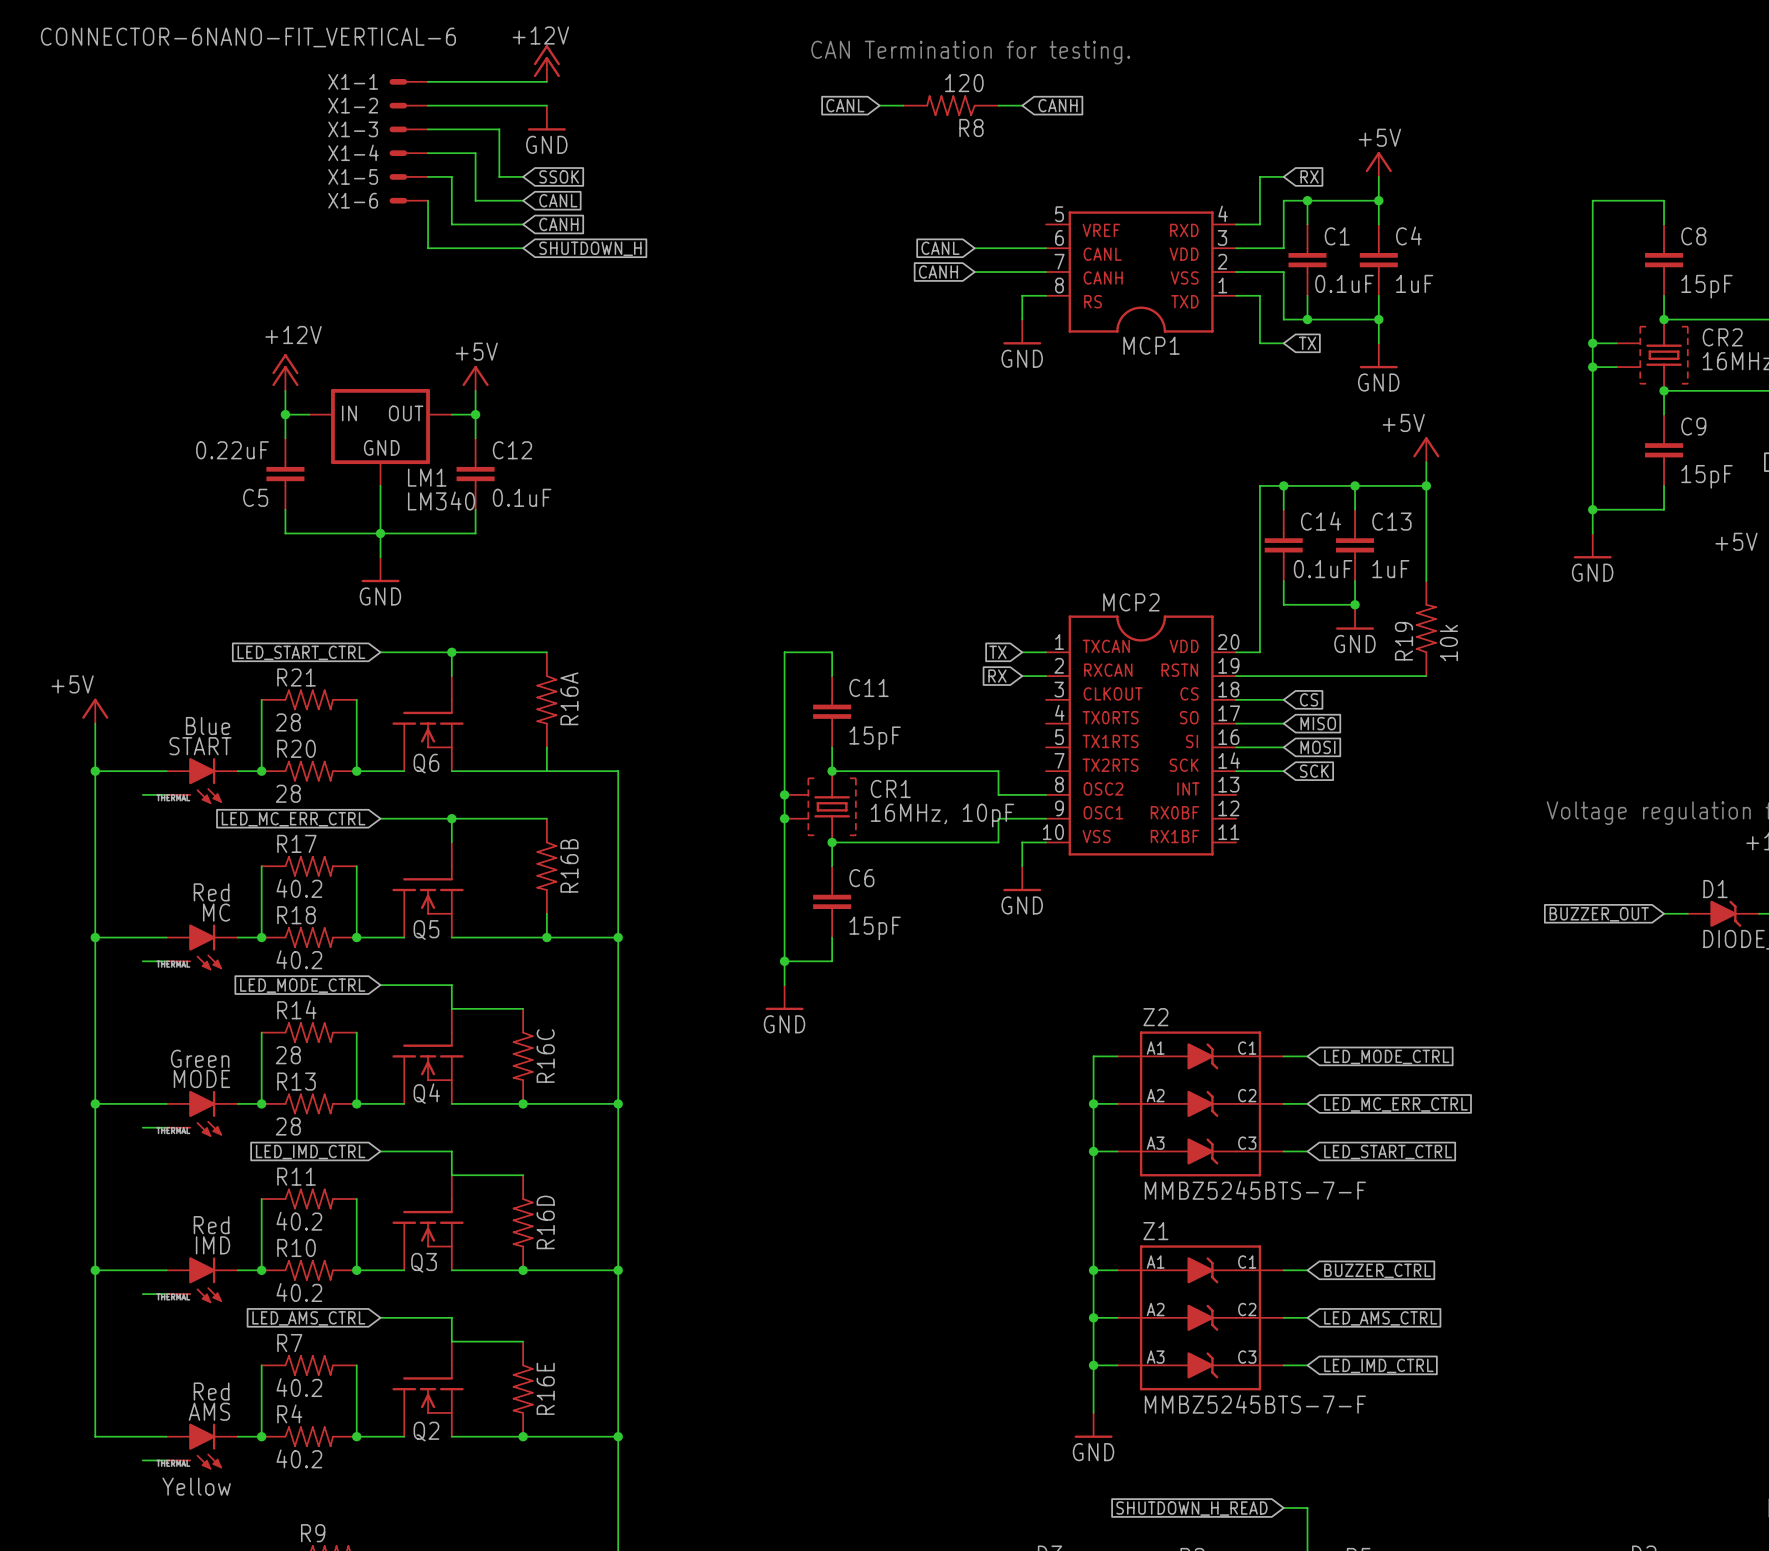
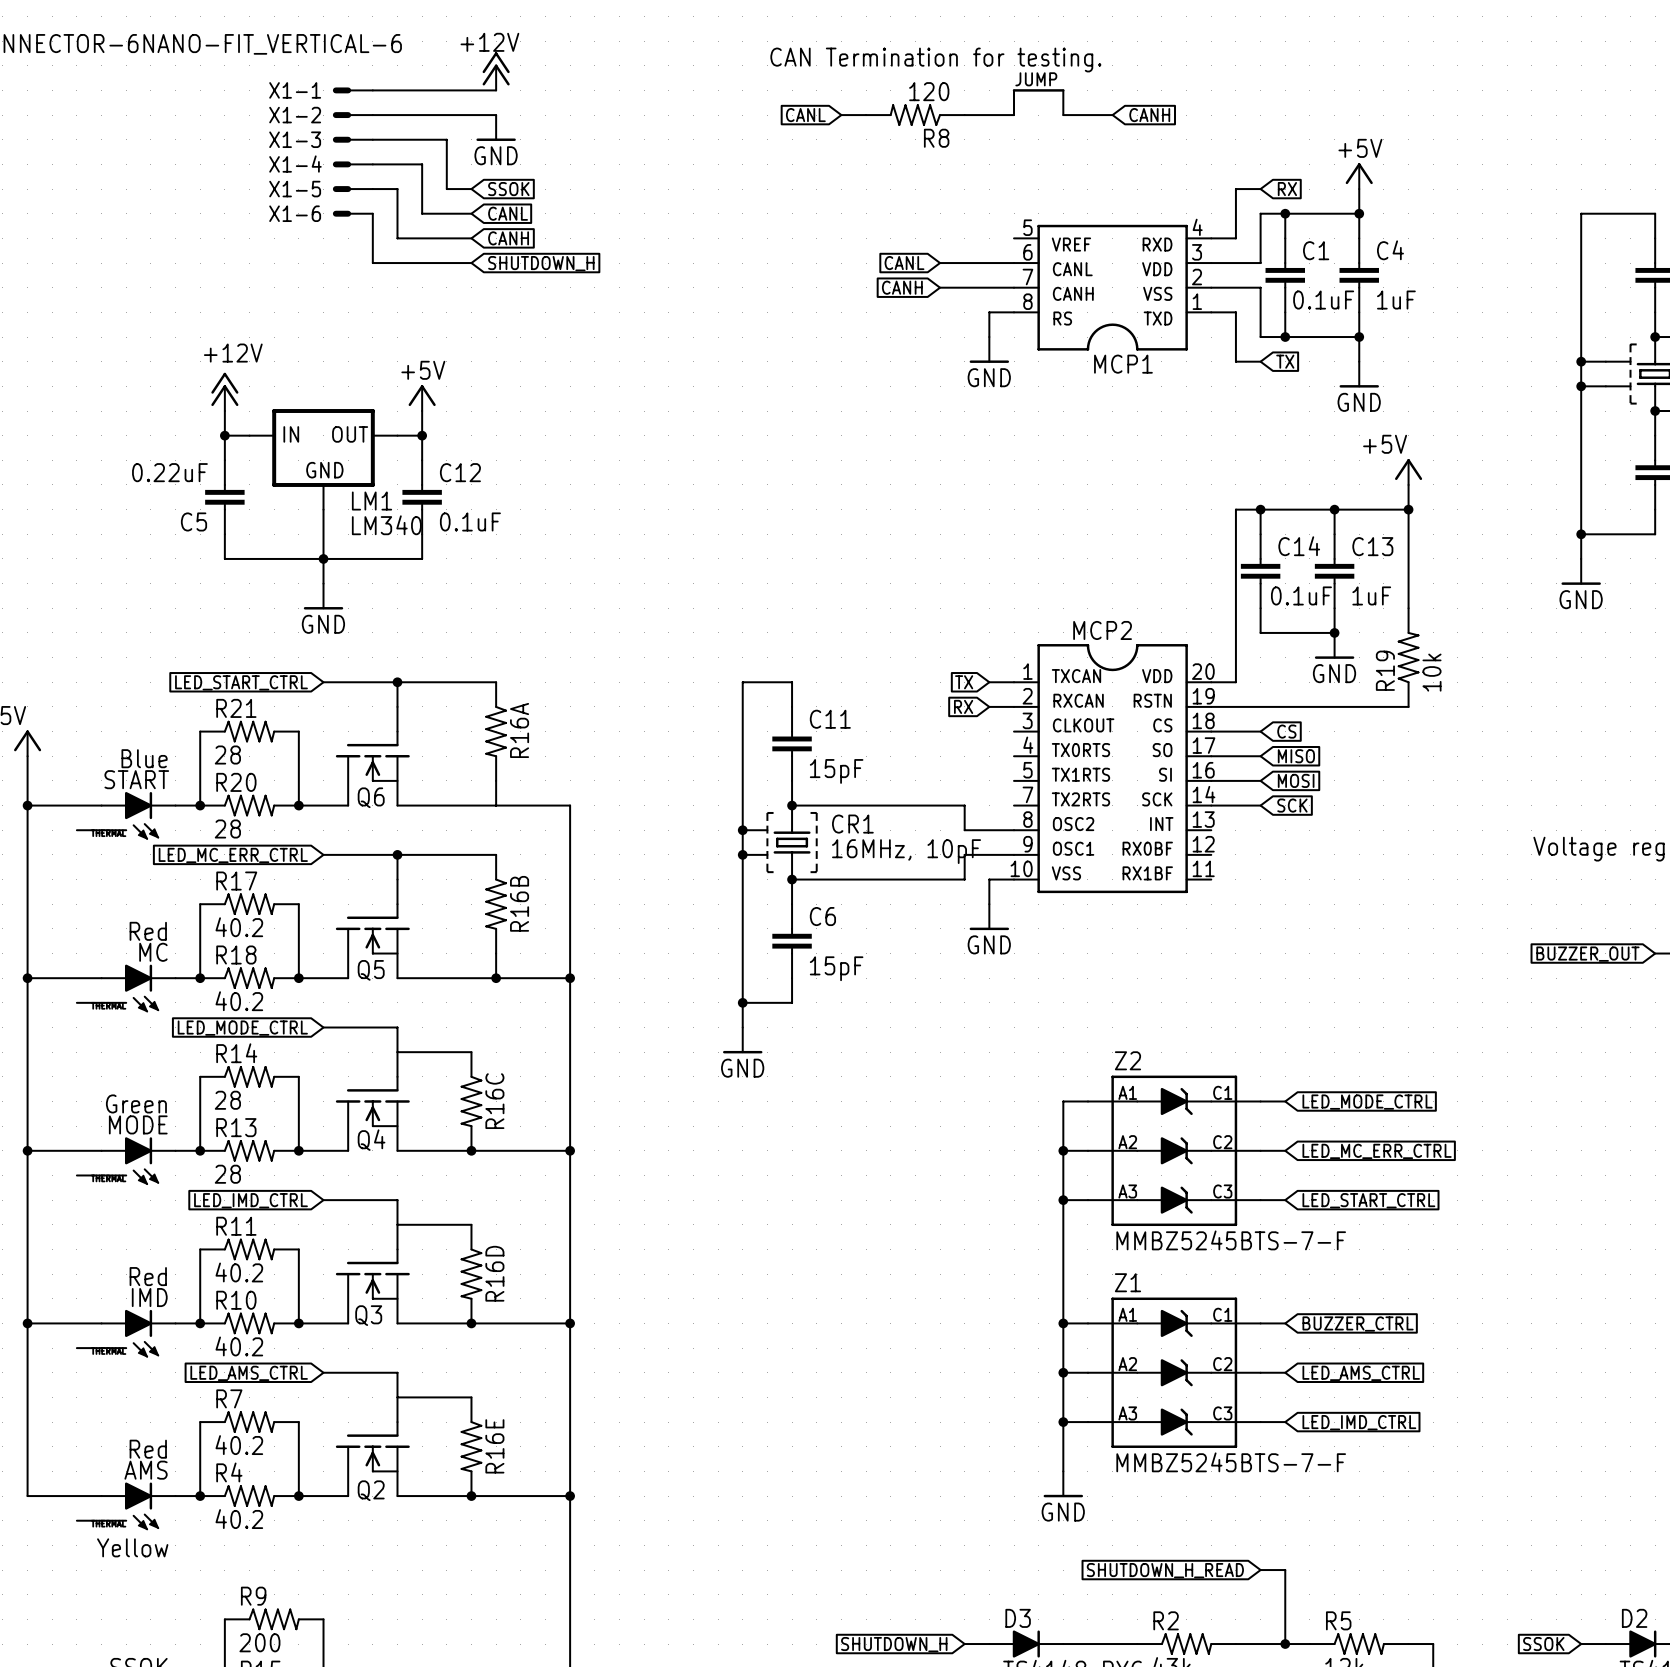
part: none -> (1038, 102)
wire: none -> (989, 115) (1014, 115)
global label position: CANH (1058, 105) -> CANH (1149, 115)
wire: none -> (1063, 115) (1112, 115)

